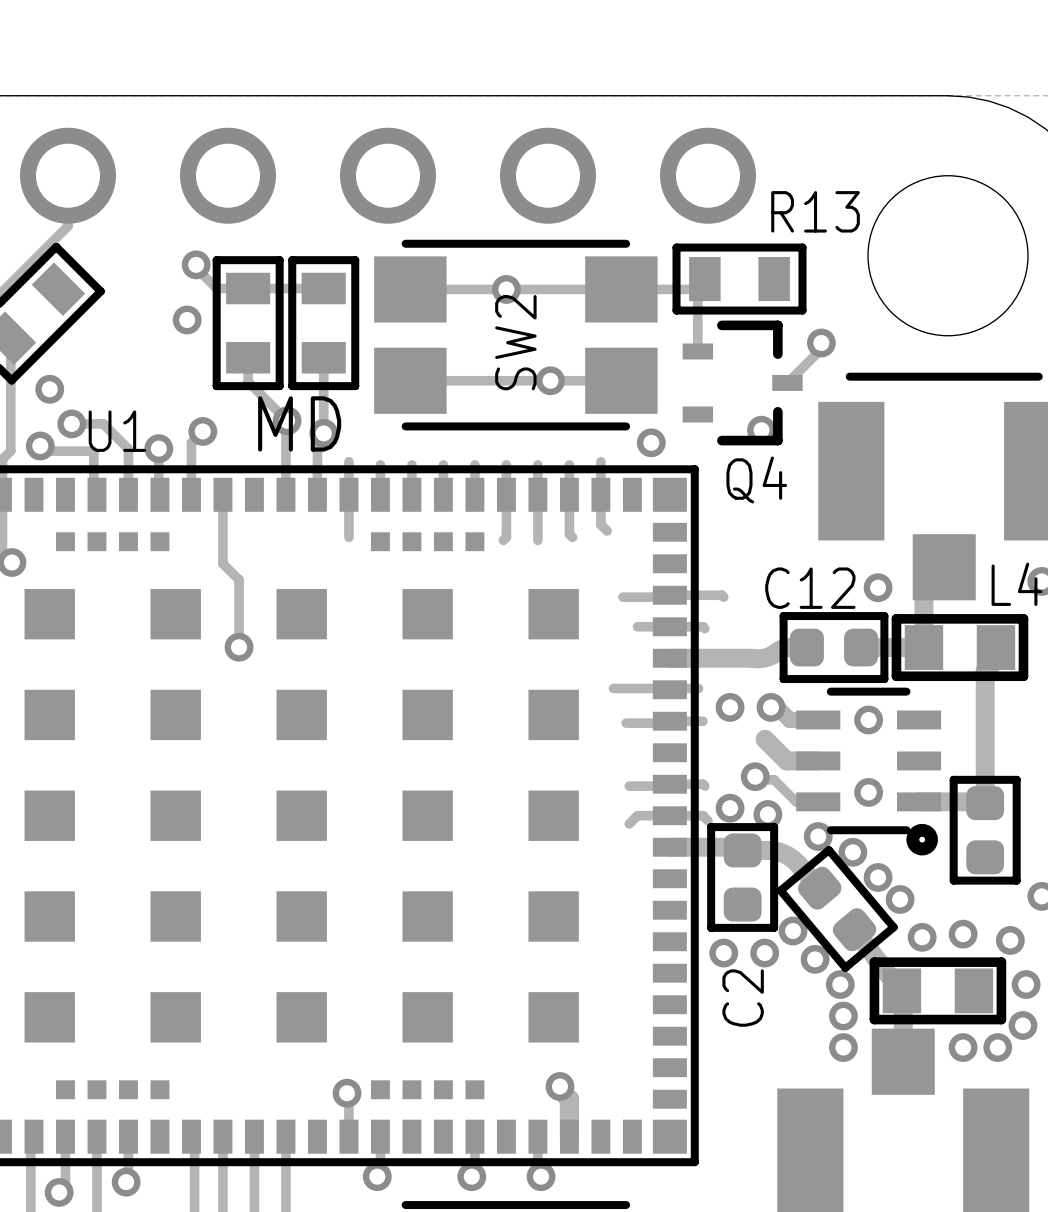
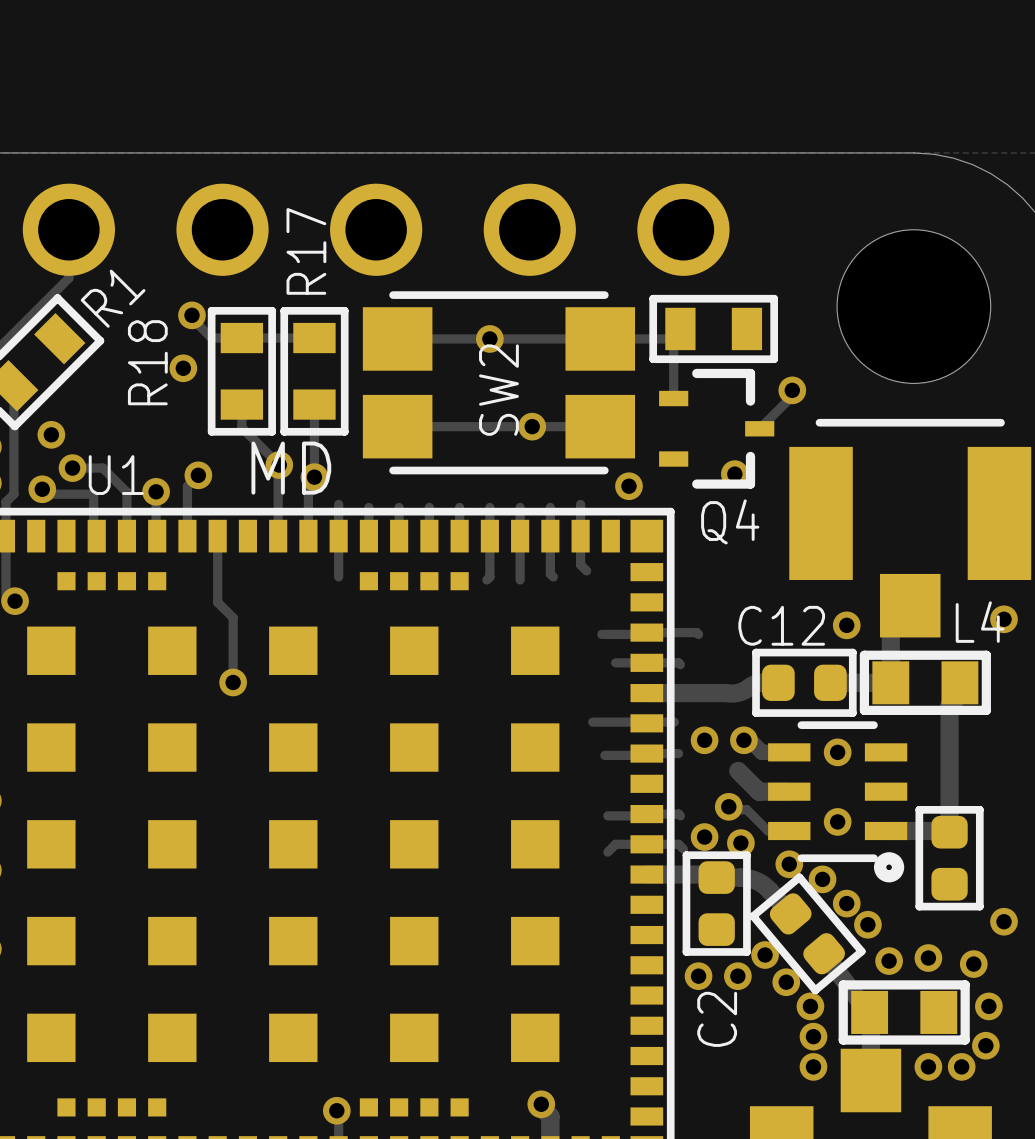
R17 name: none -> R17 (306, 251)
R13 name: R13 (815, 211) -> none
R1 name: none -> R1 (113, 298)
R18 name: none -> R18 (147, 362)

